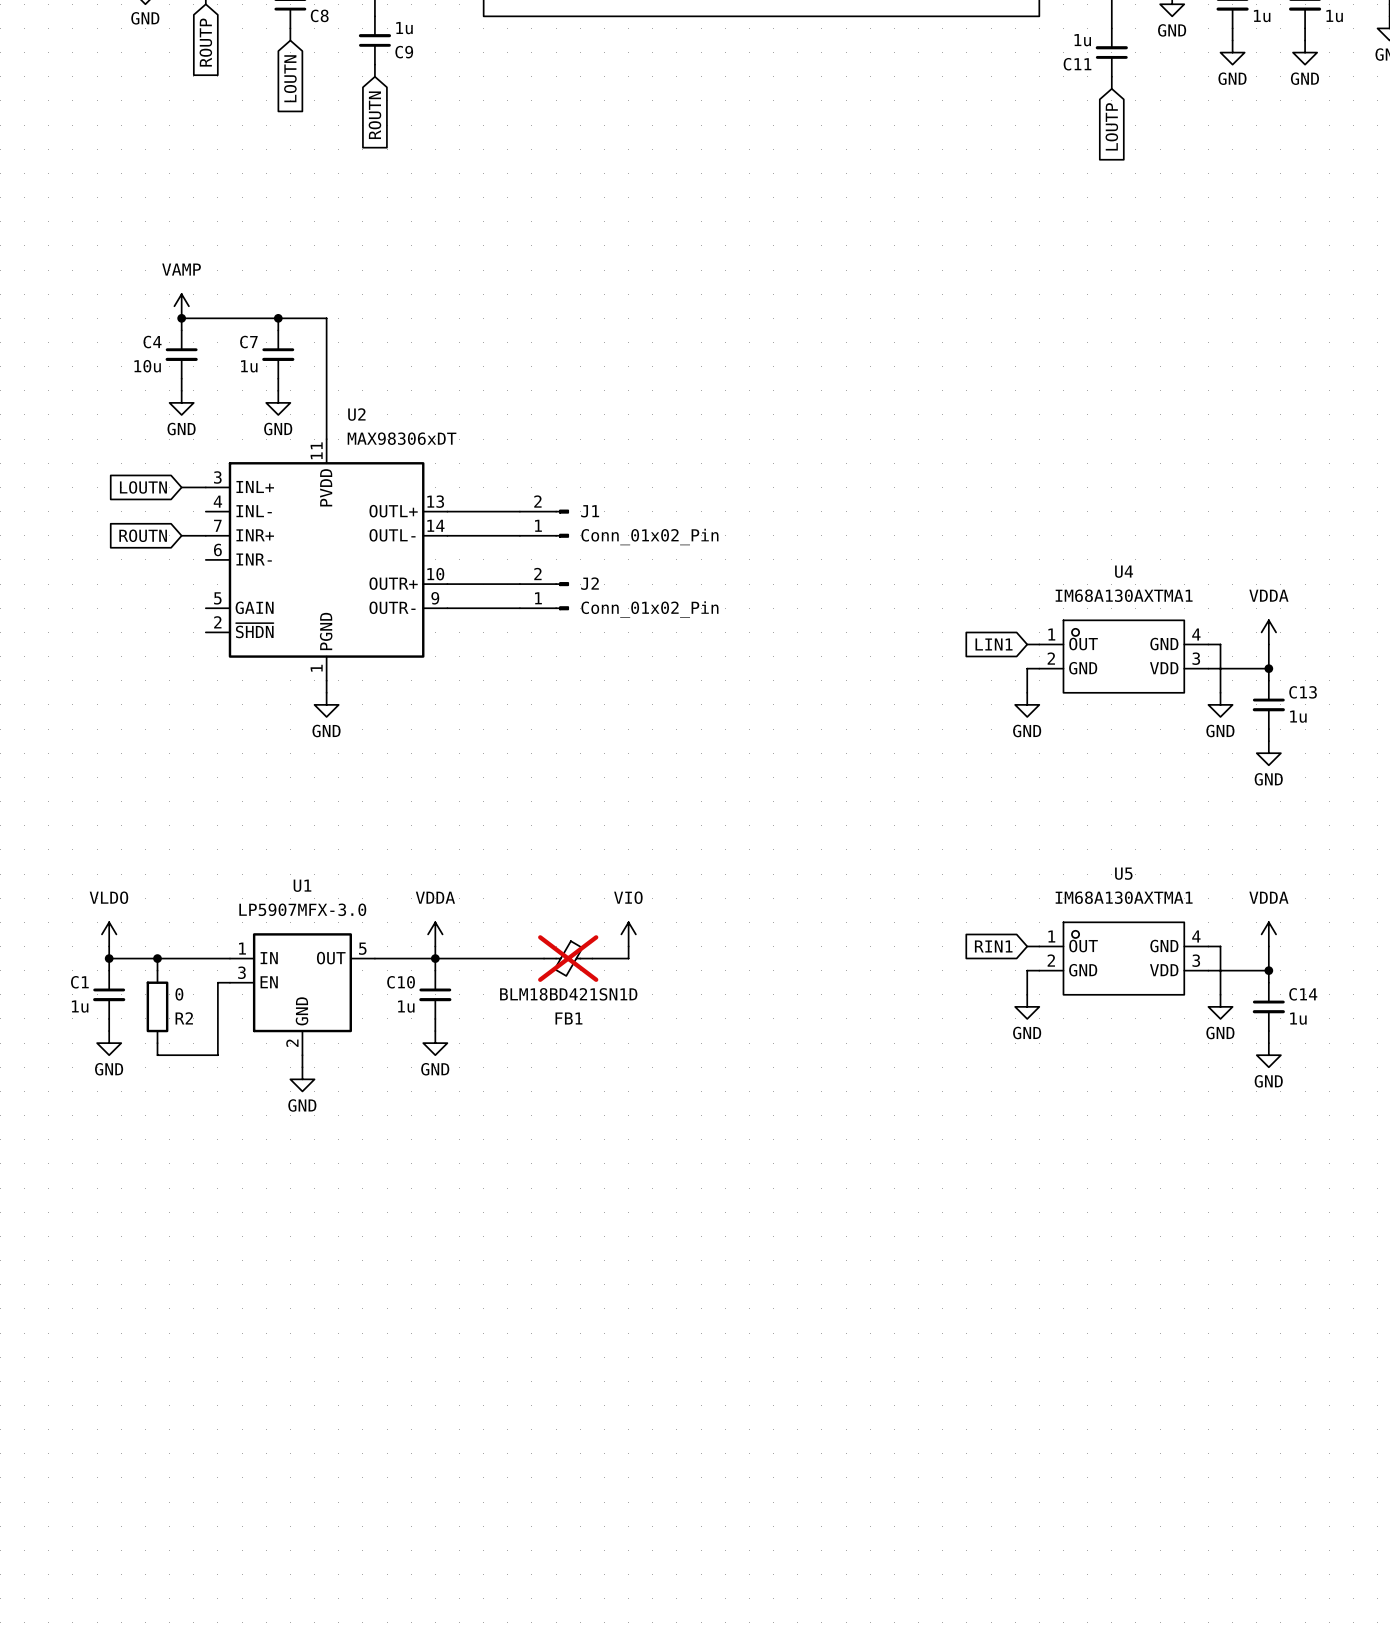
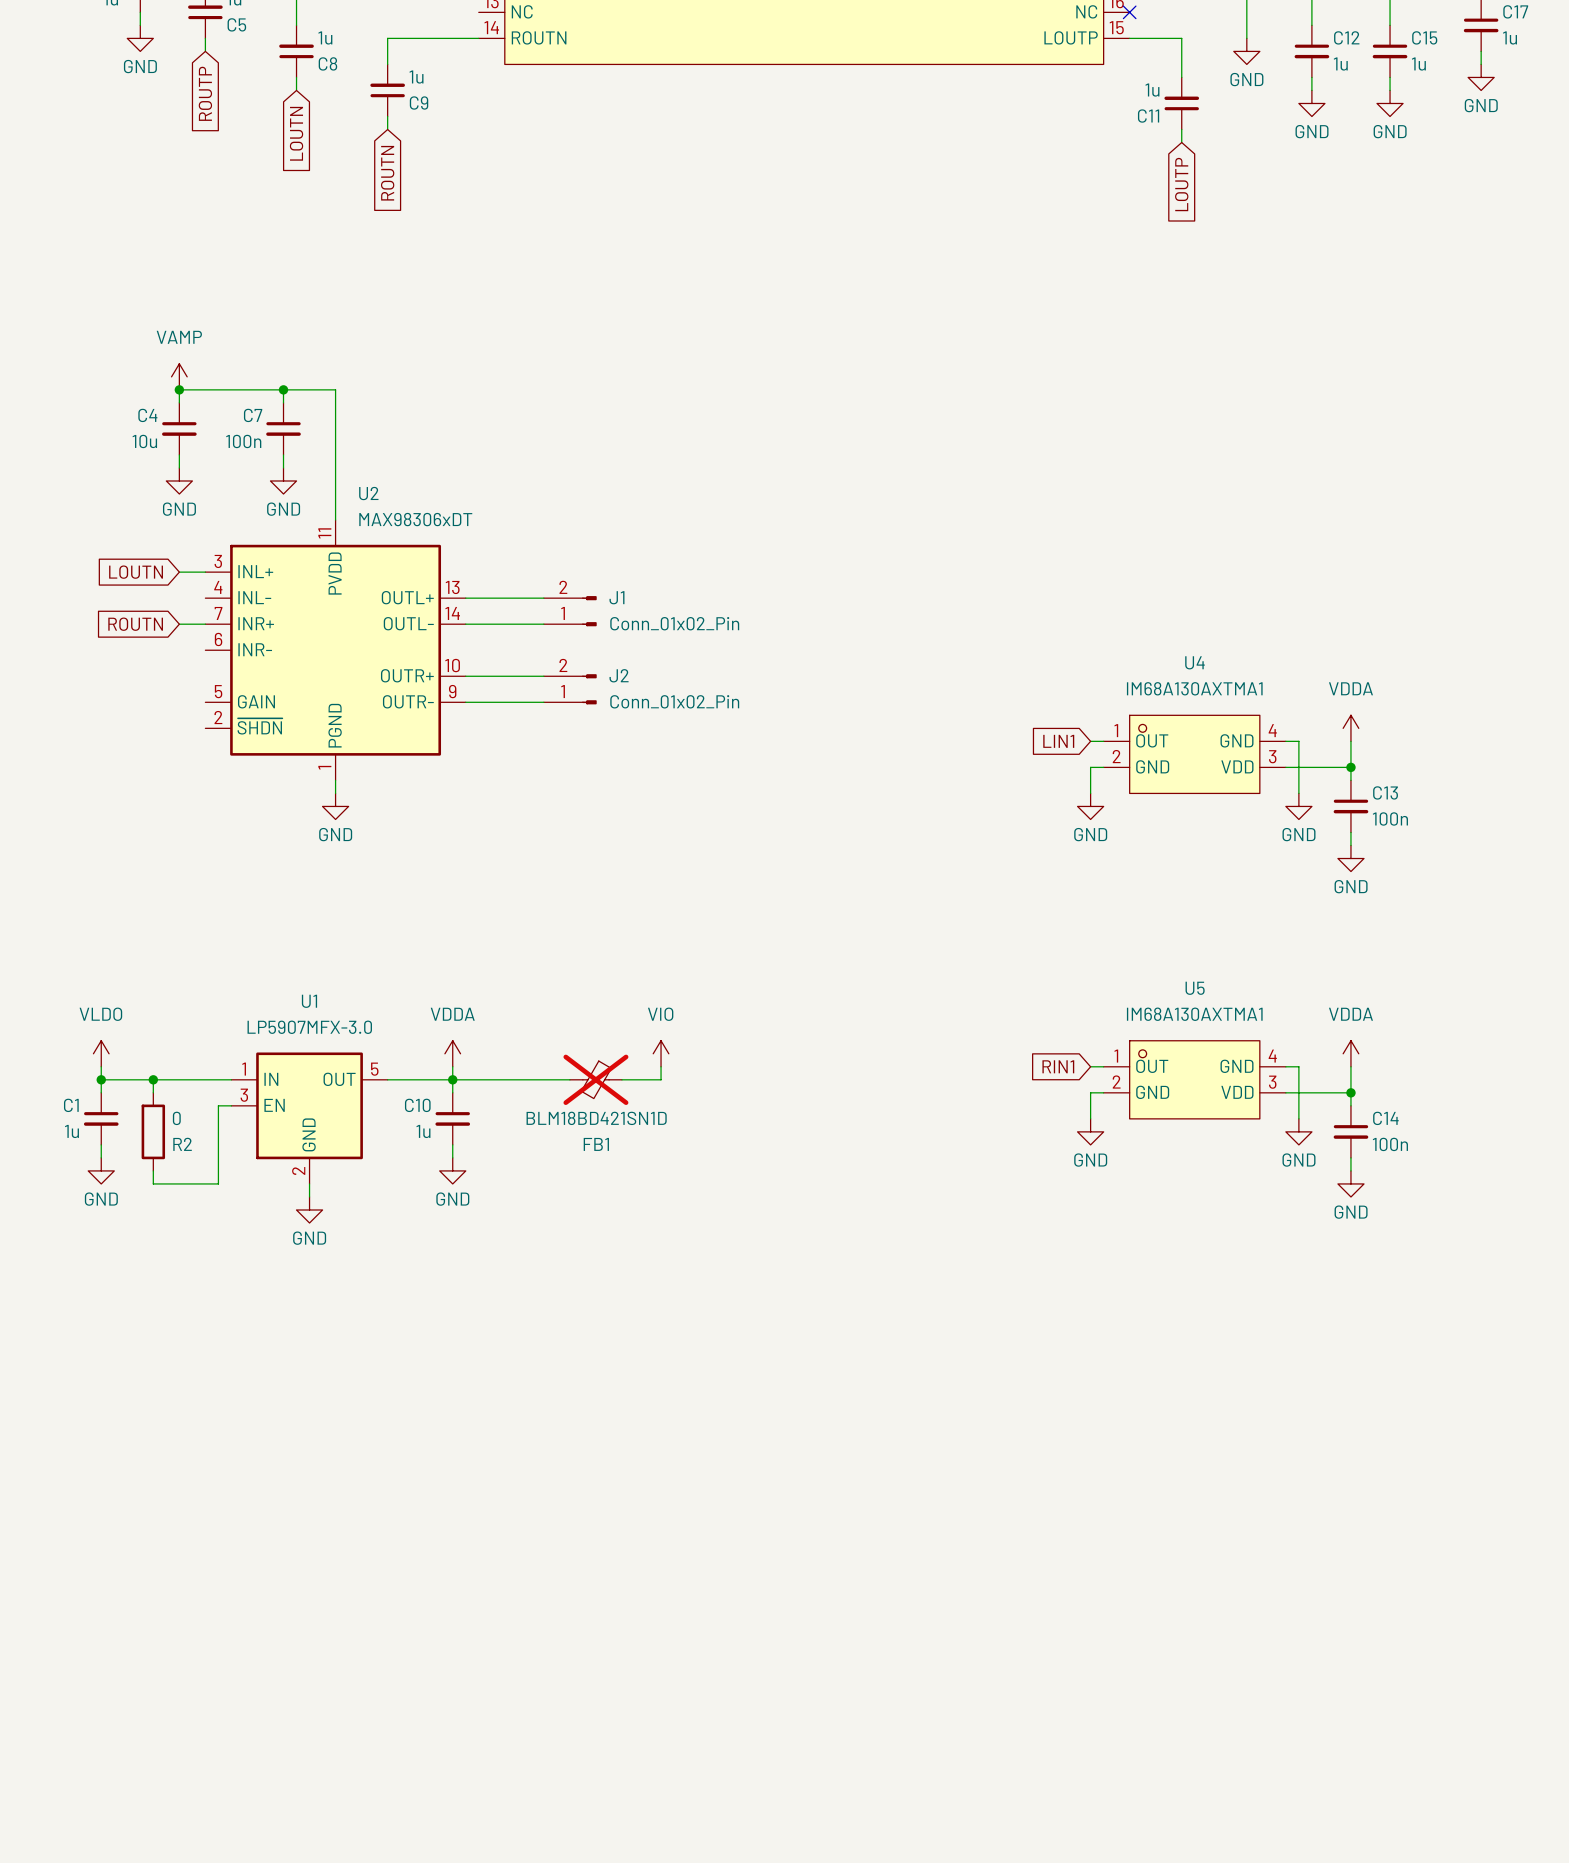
C7 value: 1u (249, 366) -> 100n (243, 441)
C13 value: 1u (1298, 716) -> 100n (1390, 818)
C14 value: 1u (1298, 1018) -> 100n (1390, 1144)

